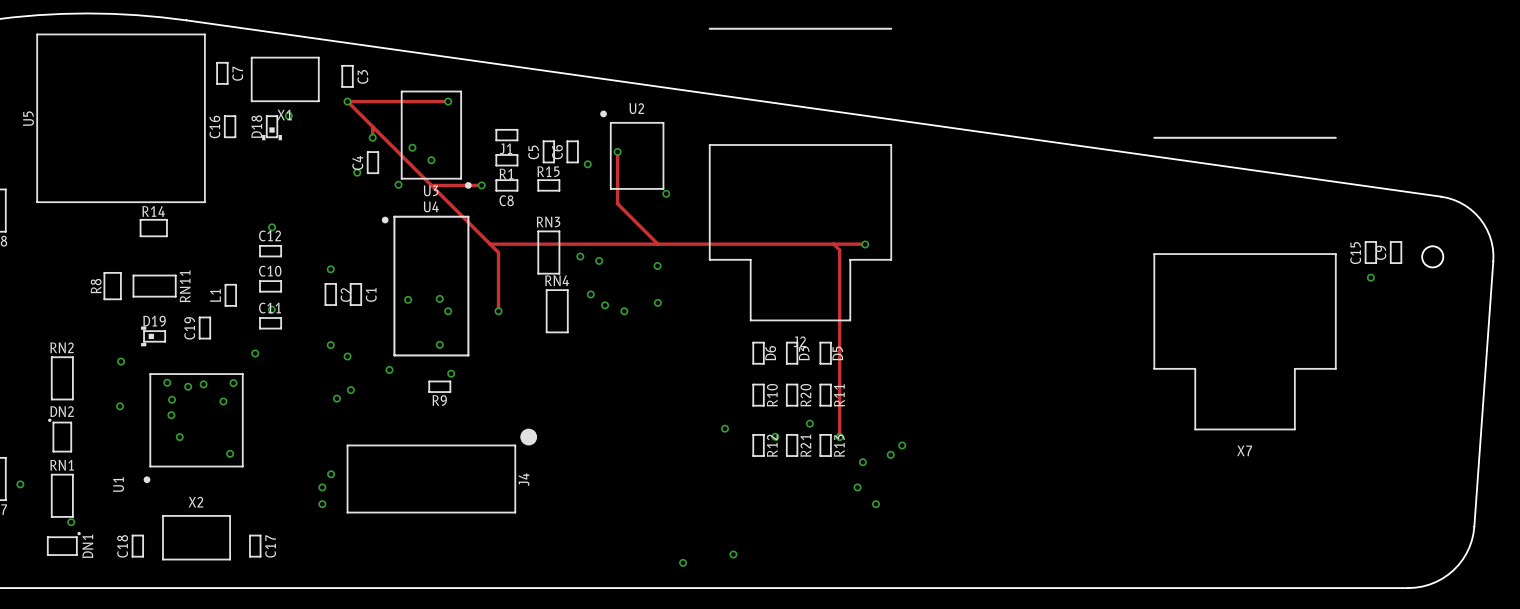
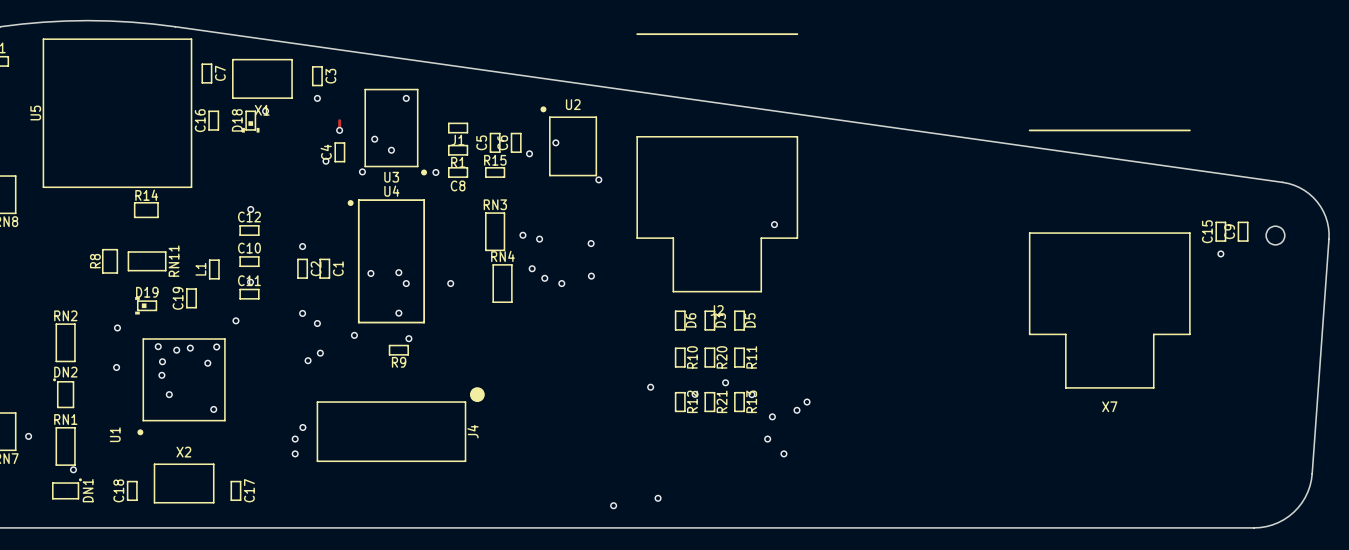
track: (448, 101) (347, 101) (498, 252) (498, 311) -> none
track: (617, 151) (617, 203) (657, 244) -> none
track: (431, 185) (481, 185) -> none
track: (490, 244) (865, 244) -> none
track: (833, 244) (839, 250) (839, 437) -> none

